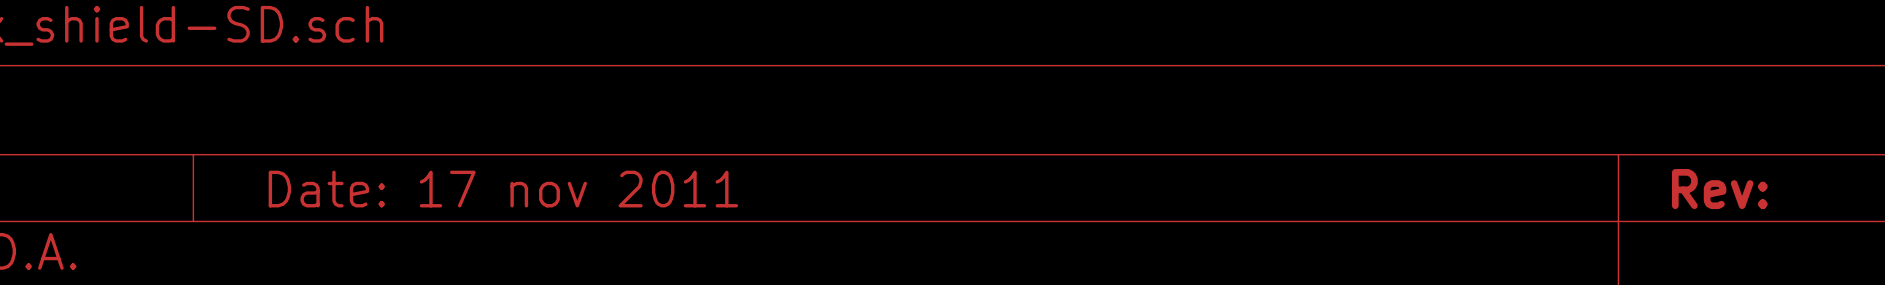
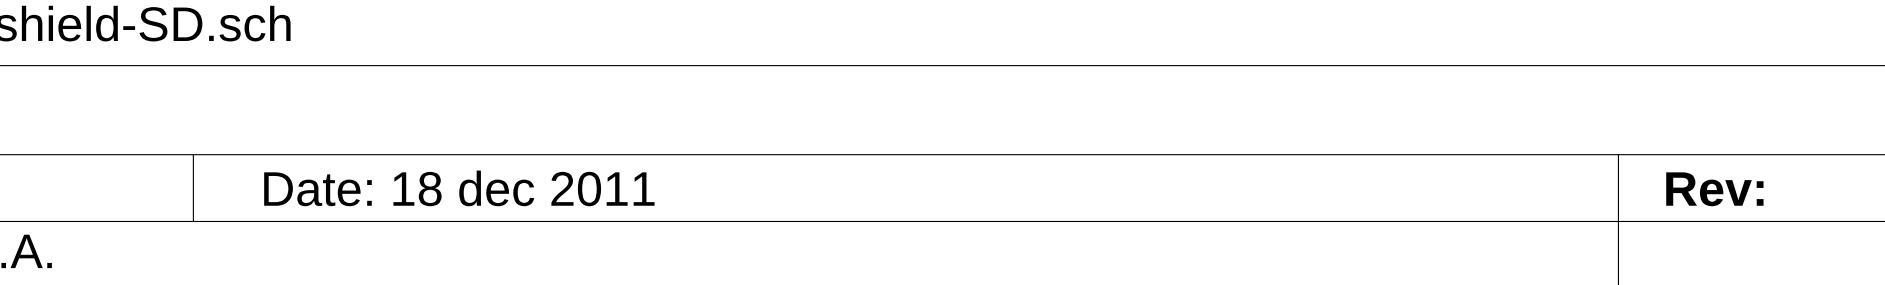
title block: Date: 17 nov 2011 (503, 189) -> Date: 18 dec 2011 (459, 188)

